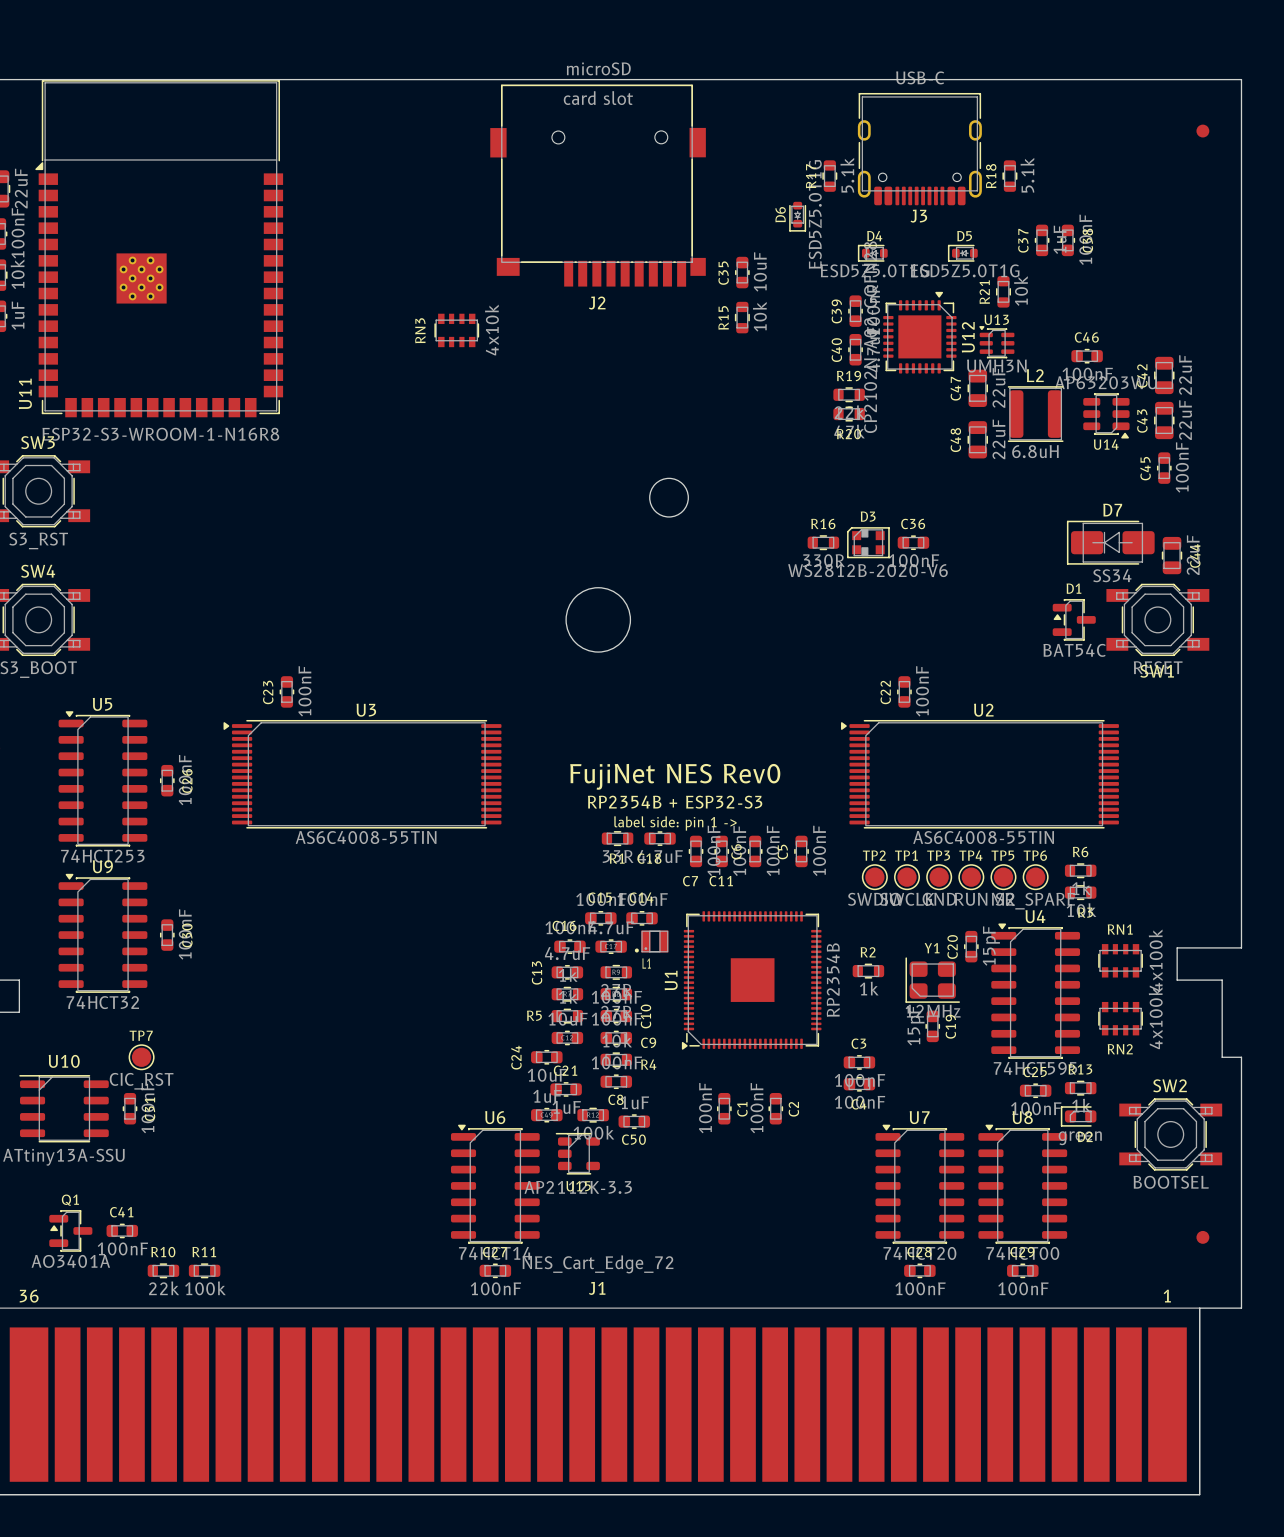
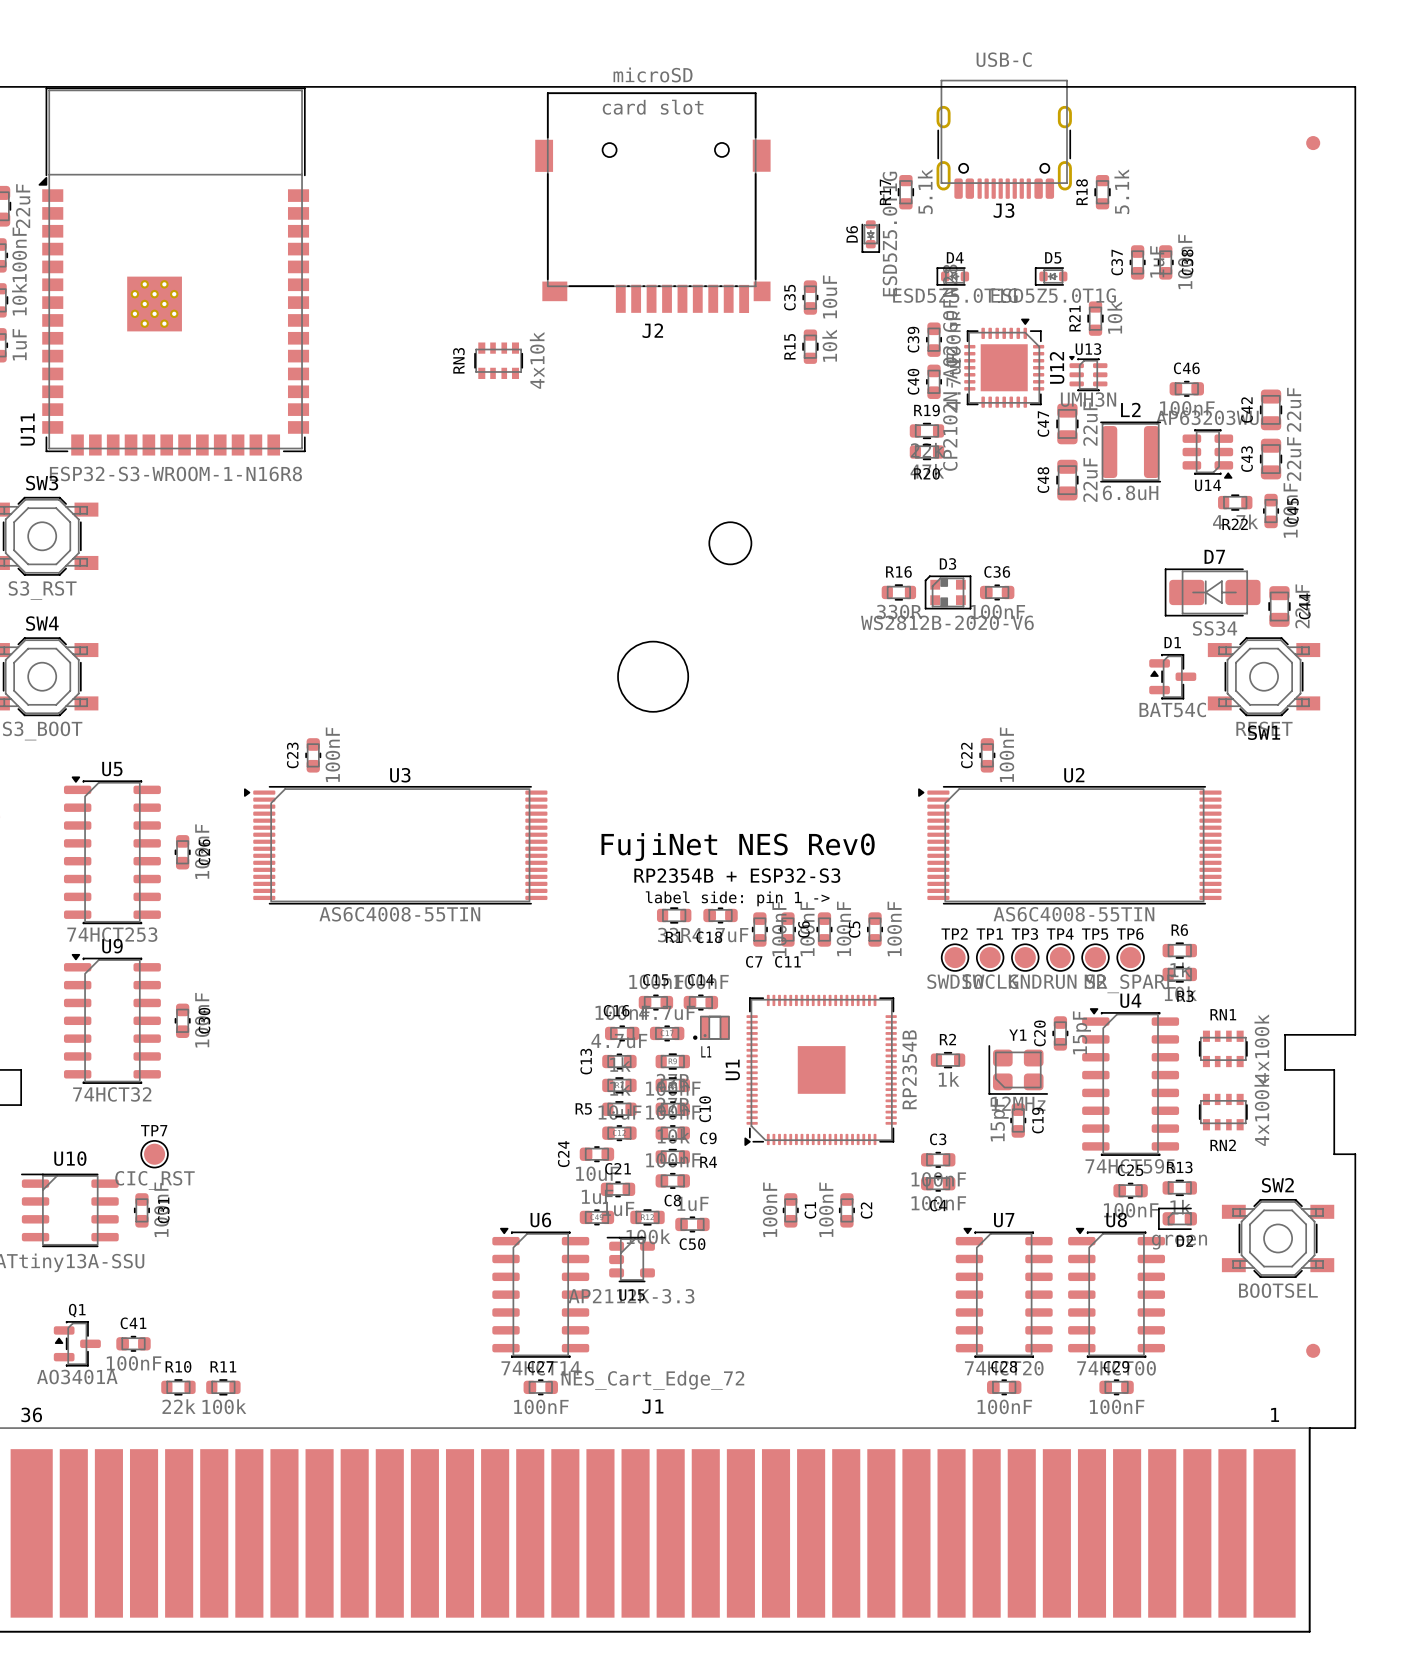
J3 footprint: [857, 92, 982, 206] -> [936, 79, 1072, 199]
R22: none -> 4.7k (1235, 502)
C45 name position: C45 (1145, 468) -> C45 (1292, 511)

